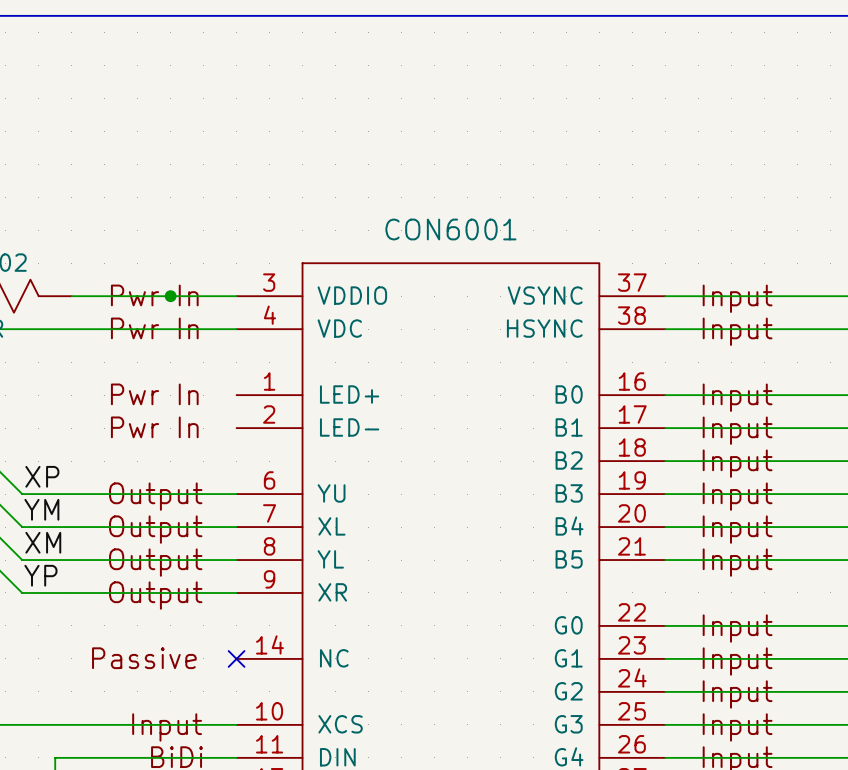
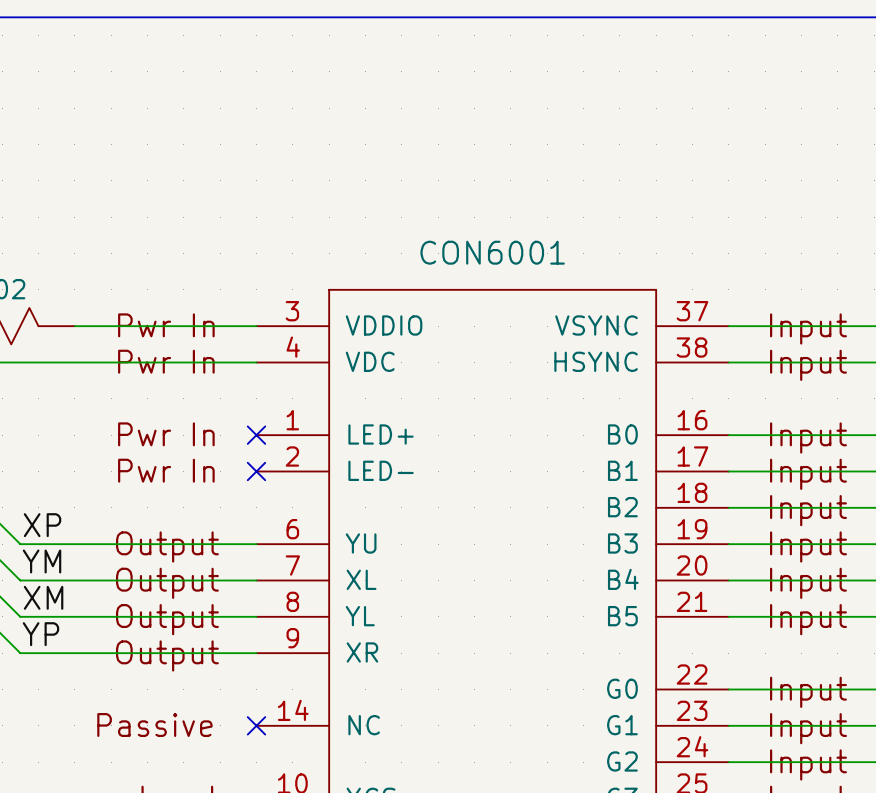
junction: (170, 296) -> none
no-connect mark: none -> (256, 435)
no-connect mark: none -> (256, 471)

